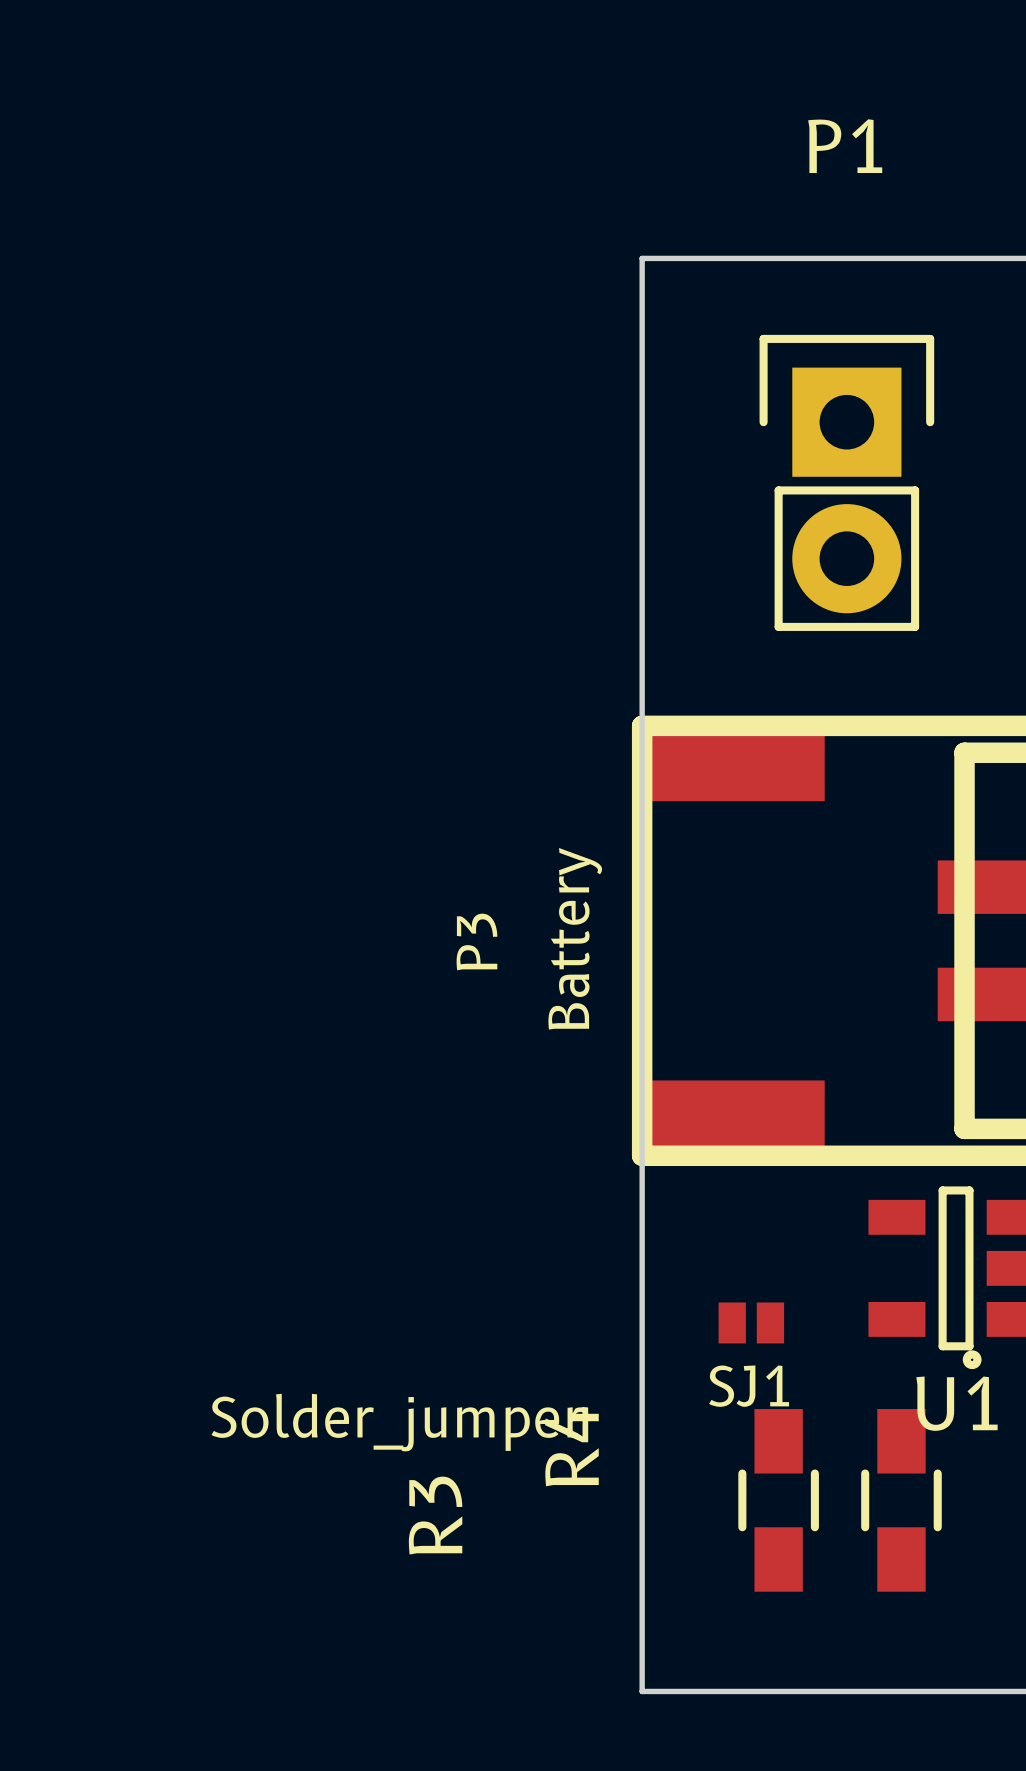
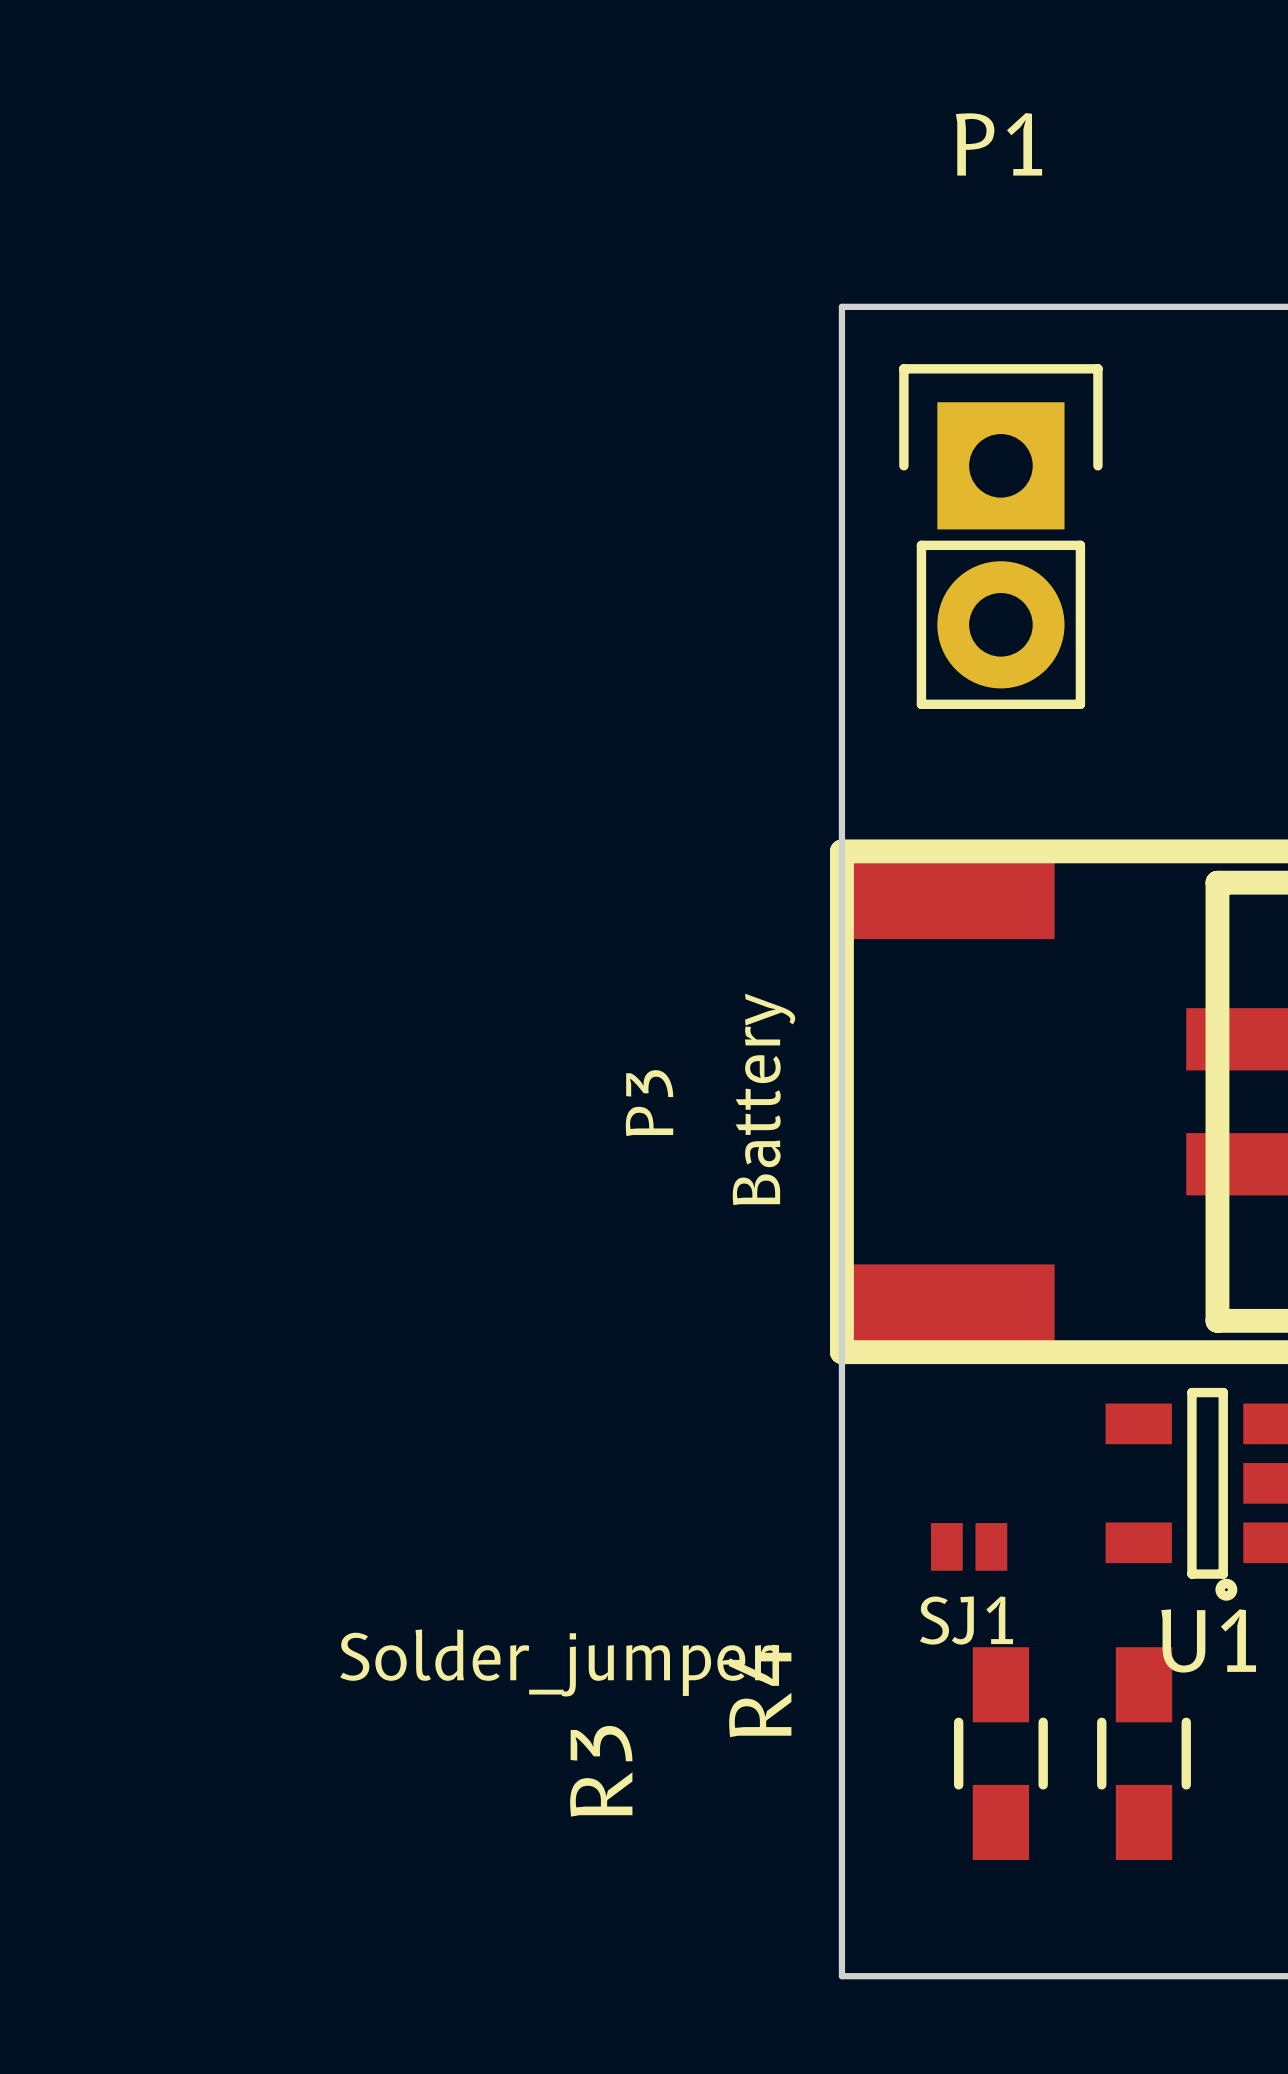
P1 position: (846, 482) -> (1000, 536)

